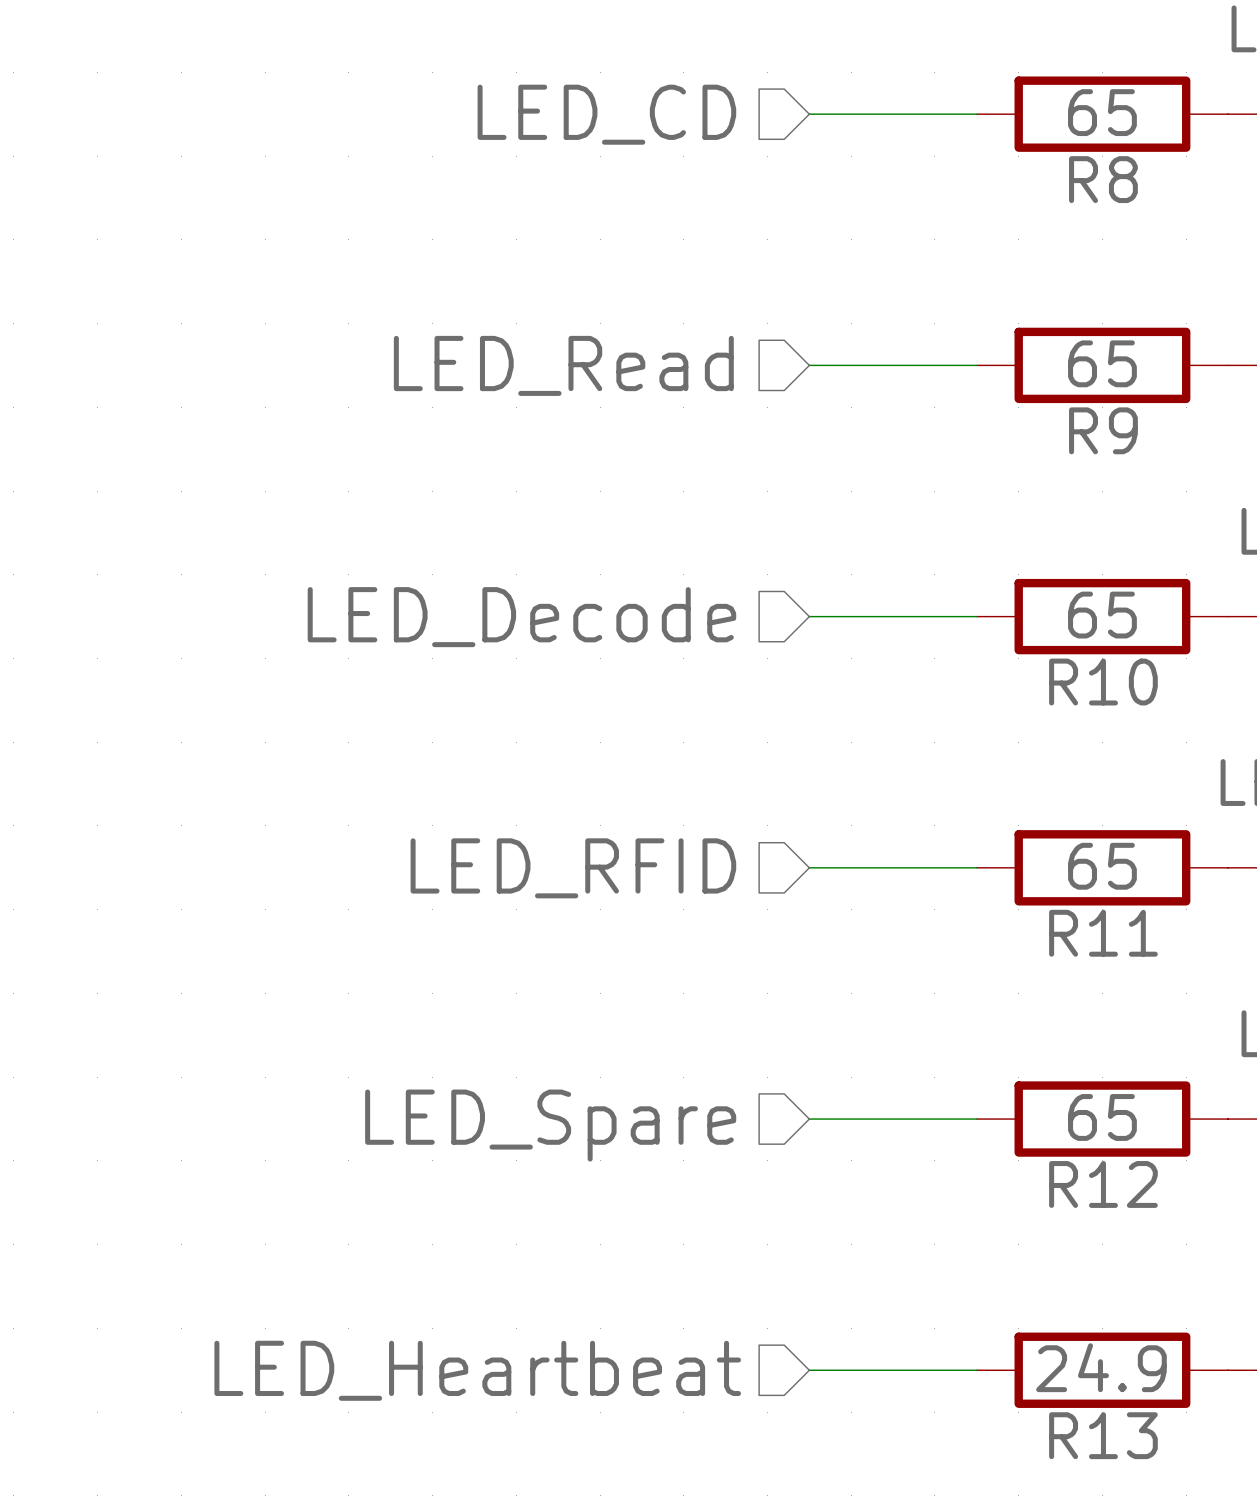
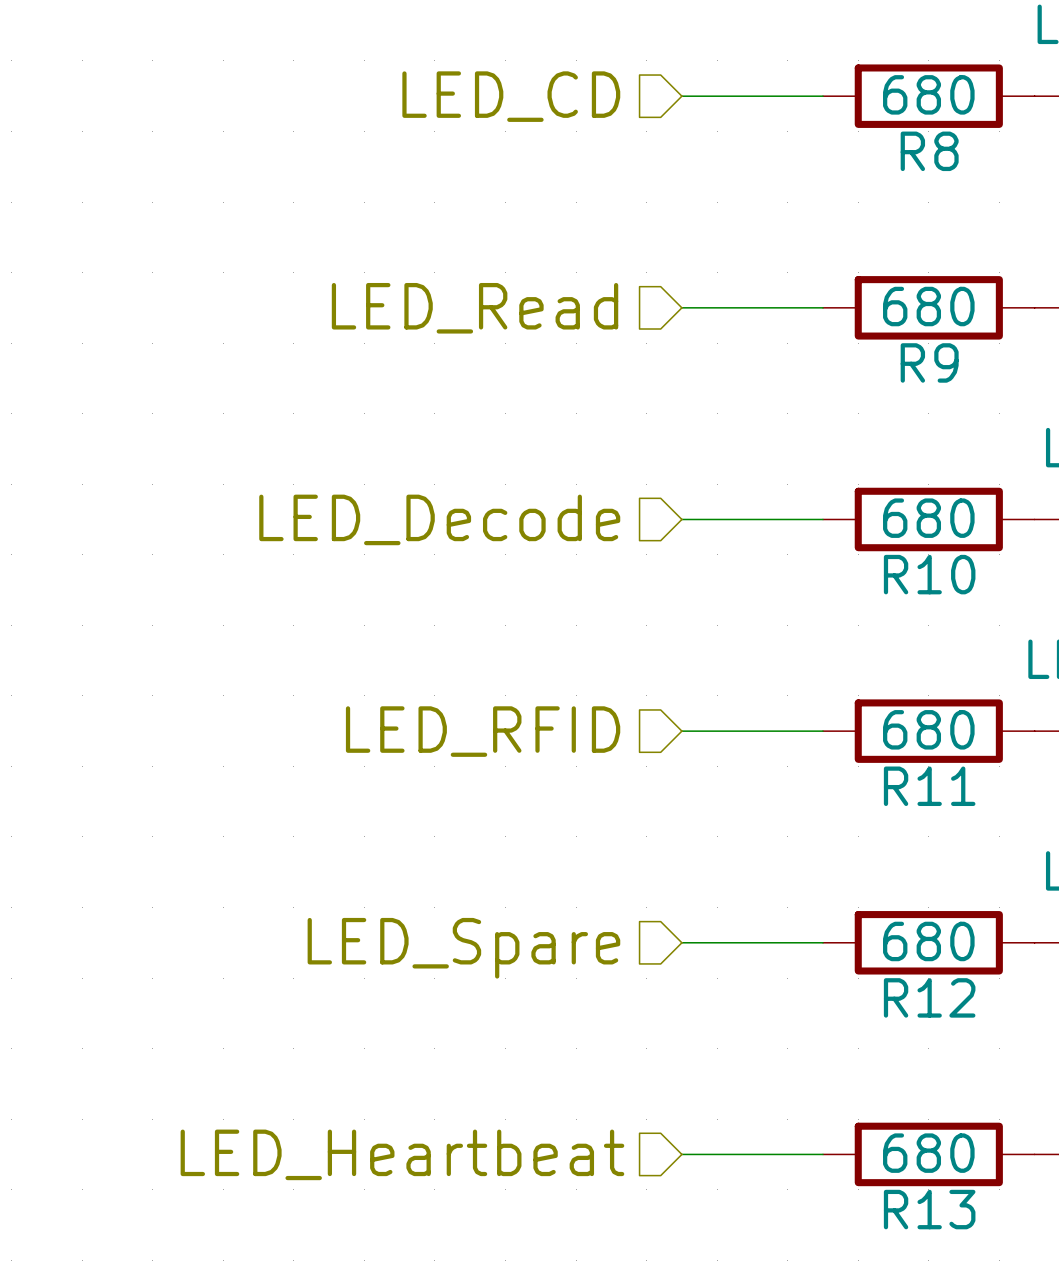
R8 value: 65 (1102, 112) -> 680 (928, 94)
R9 value: 65 (1102, 363) -> 680 (928, 306)
R10 value: 65 (1102, 615) -> 680 (928, 518)
R11 value: 65 (1102, 866) -> 680 (928, 729)
R12 value: 65 (1102, 1117) -> 680 (928, 941)
R13 value: 24.9 (1101, 1367) -> 680 (928, 1153)

